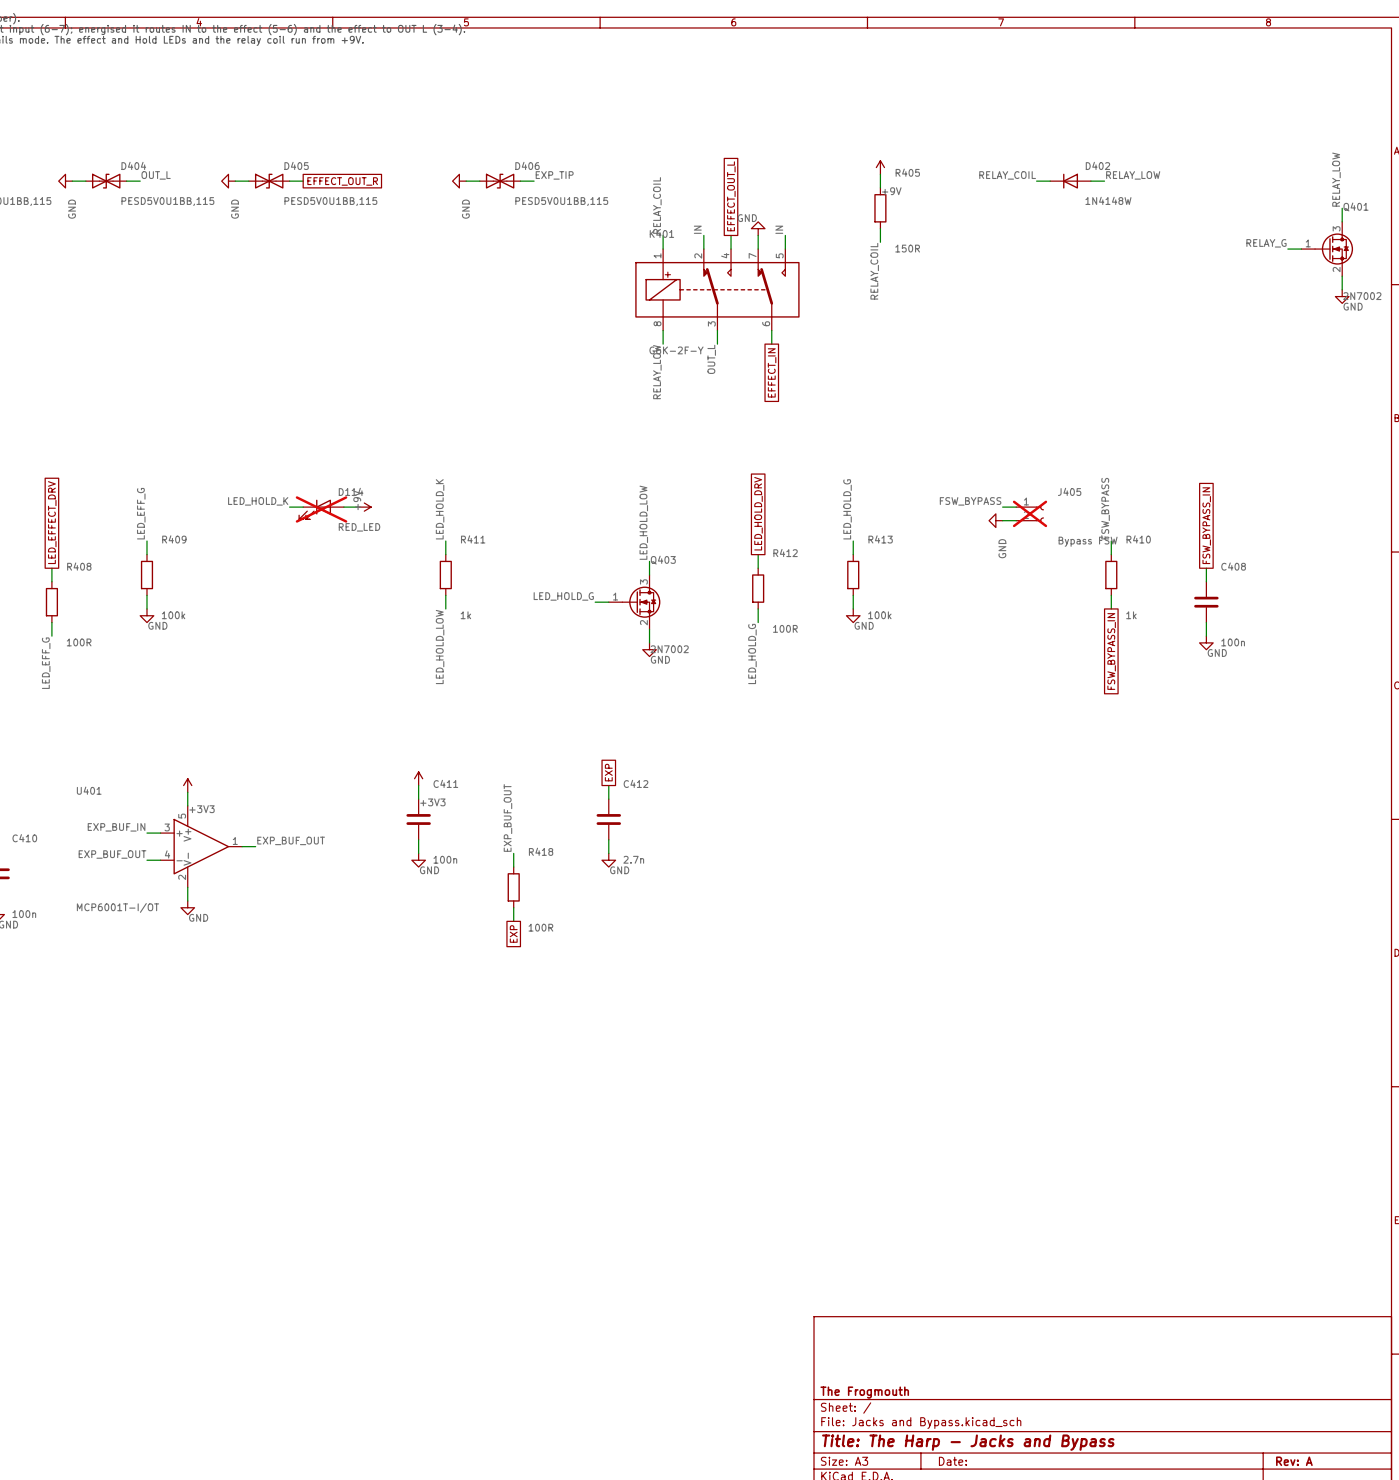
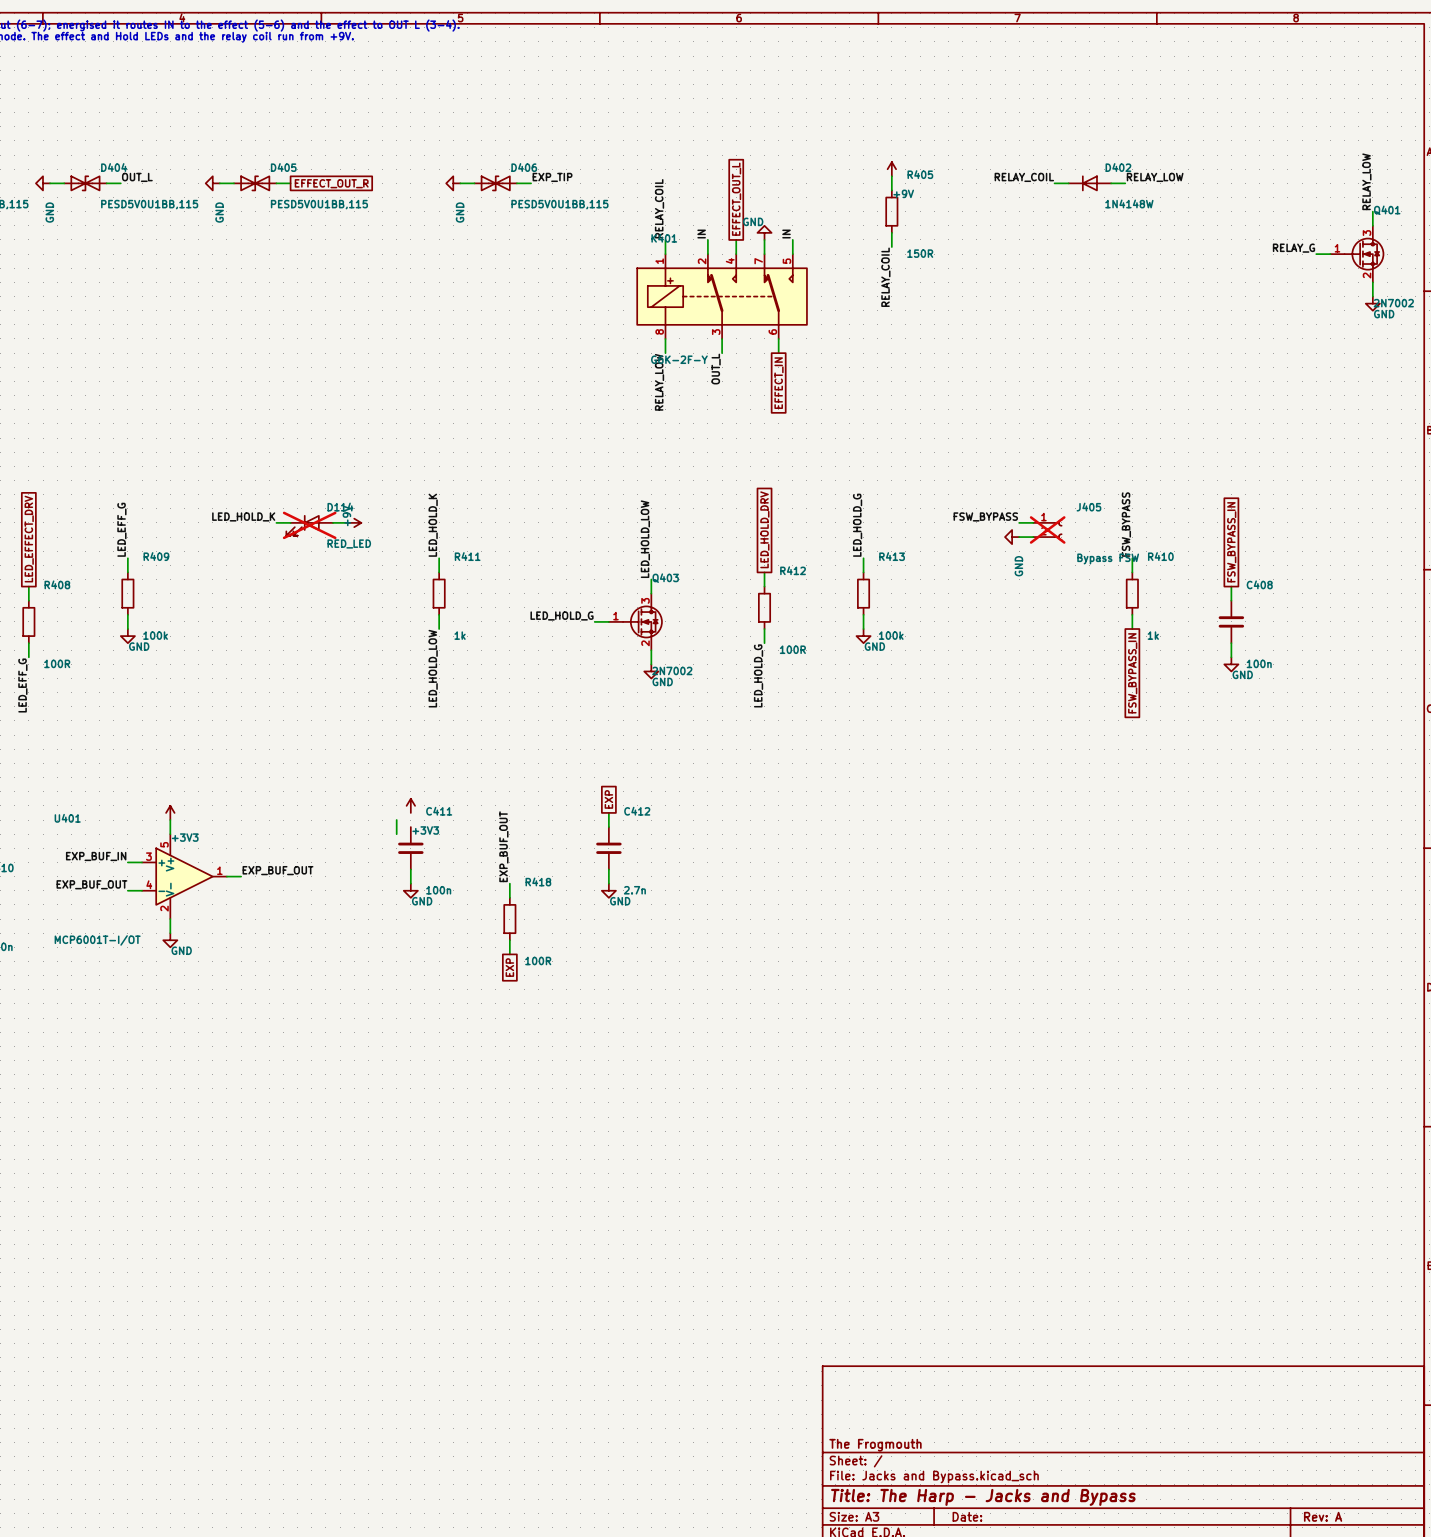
wire: (418, 785) (418, 799) -> (396, 820) (396, 834)

